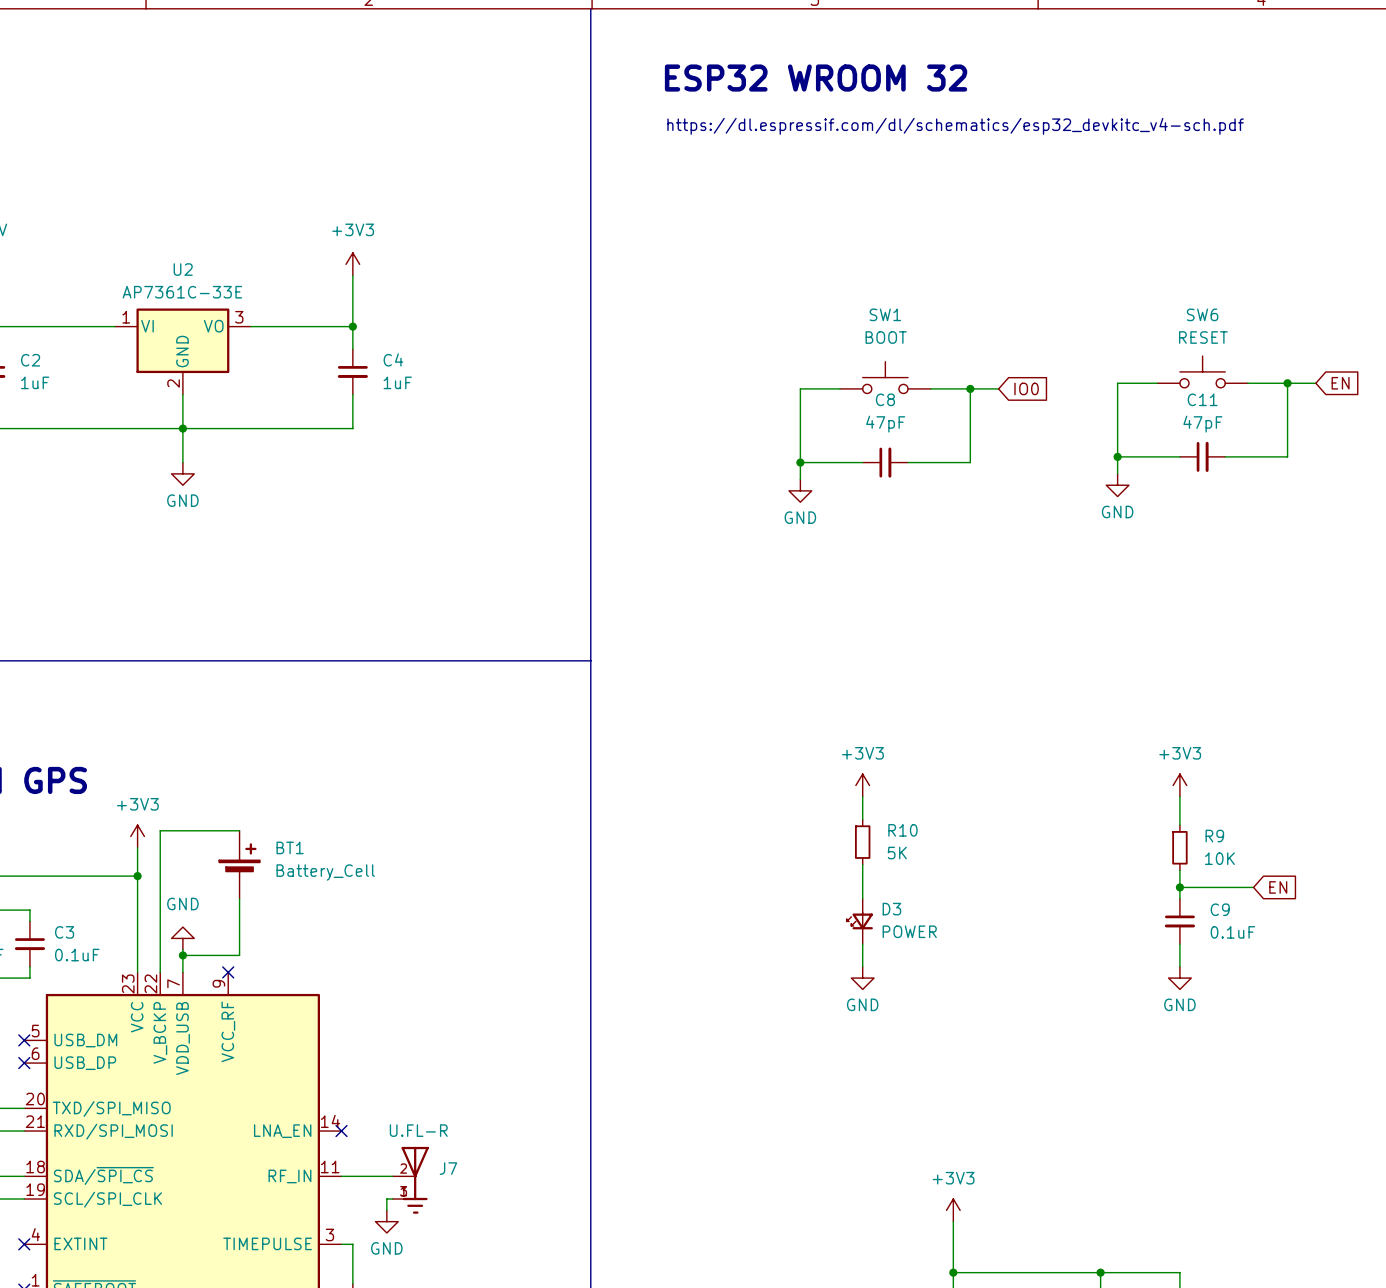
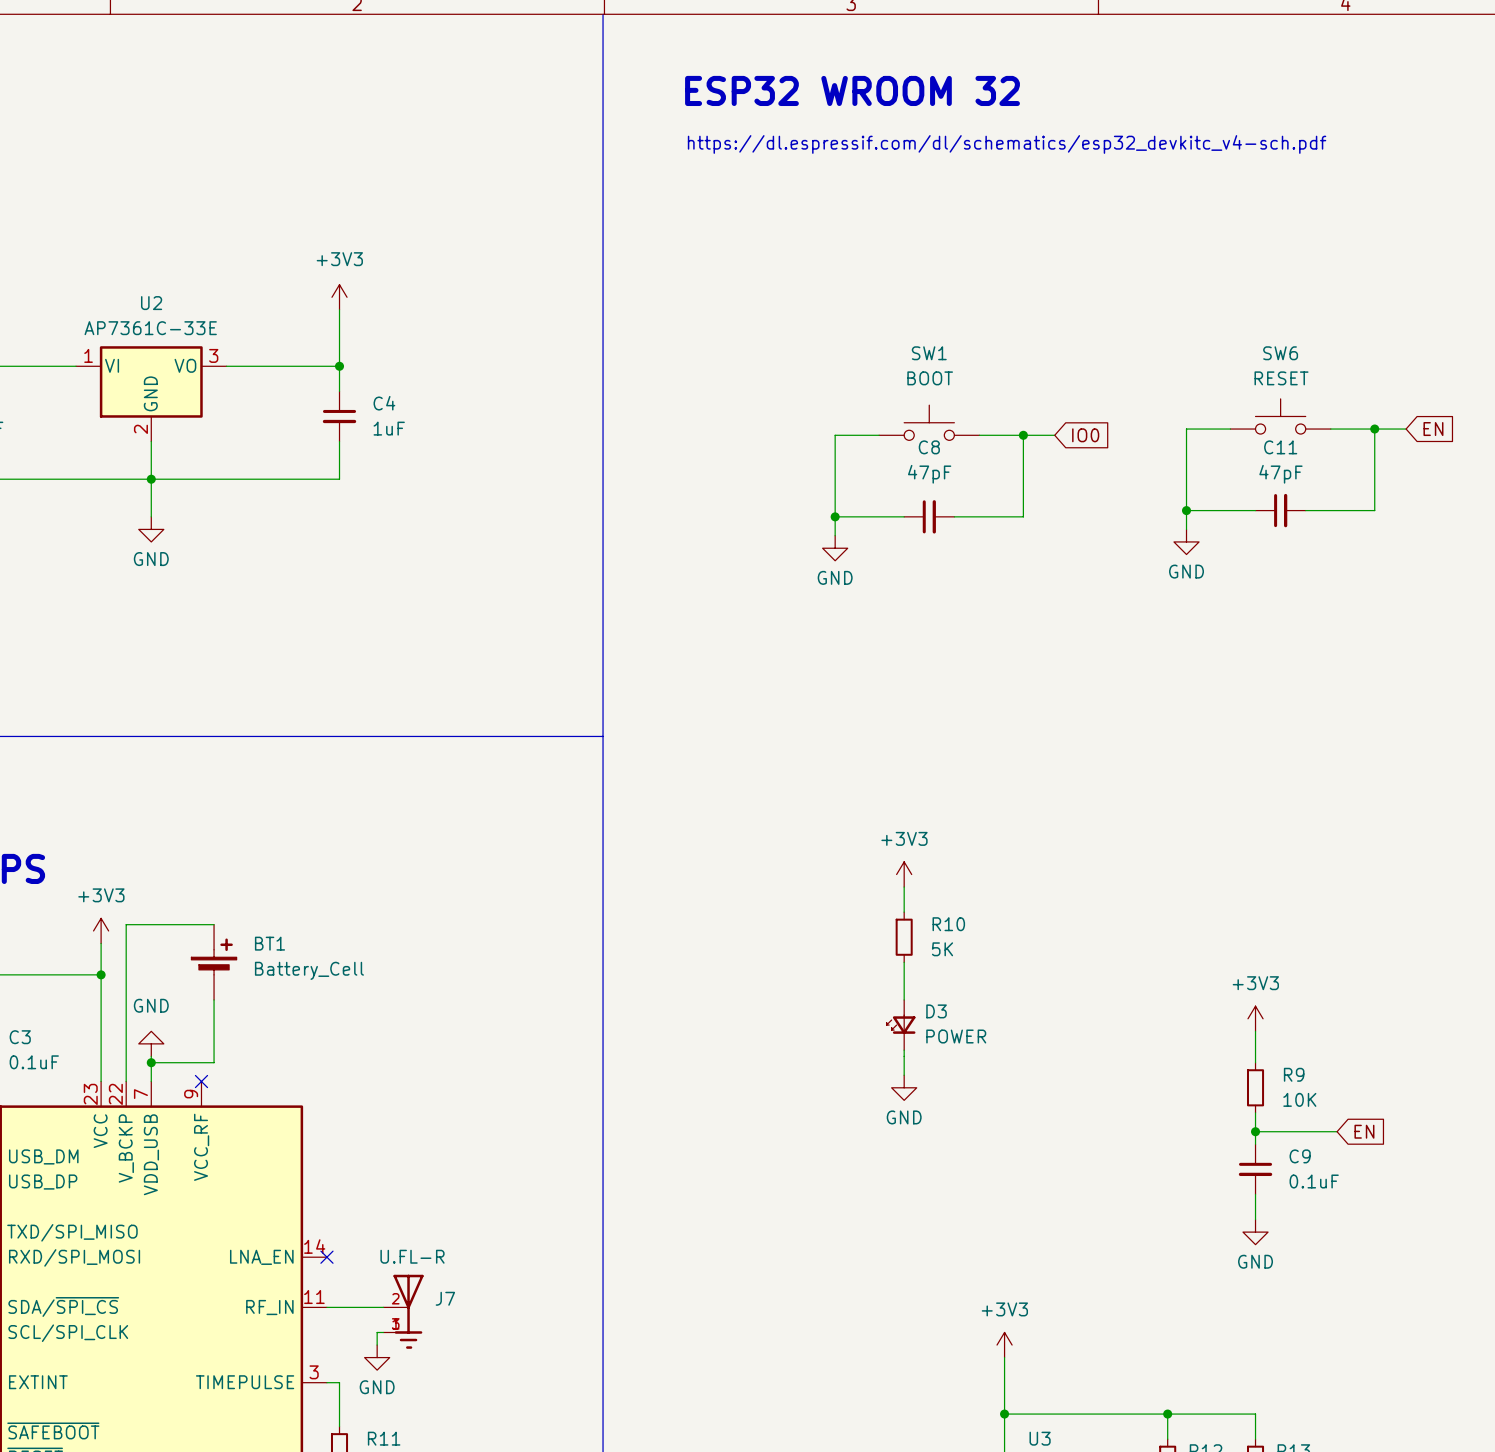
power symbol position: +3V3 (1179, 785) -> +3V3 (1255, 1018)
wire: (1179, 796) (1179, 825) -> none
R9 position: (1179, 847) -> (1255, 1087)
wire: (1179, 870) (1179, 898) -> (1255, 1112) (1255, 1144)
wire: (1179, 887) (1253, 887) -> (1255, 1131) (1337, 1131)
junction: (1179, 887) -> none
global label position: EN (1278, 887) -> EN (1364, 1131)
C9 position: (1179, 921) -> (1255, 1169)
power symbol position: GND (1179, 978) -> GND (1255, 1232)
junction: none -> (1255, 1131)
wire: none -> (1255, 1194) (1255, 1219)

